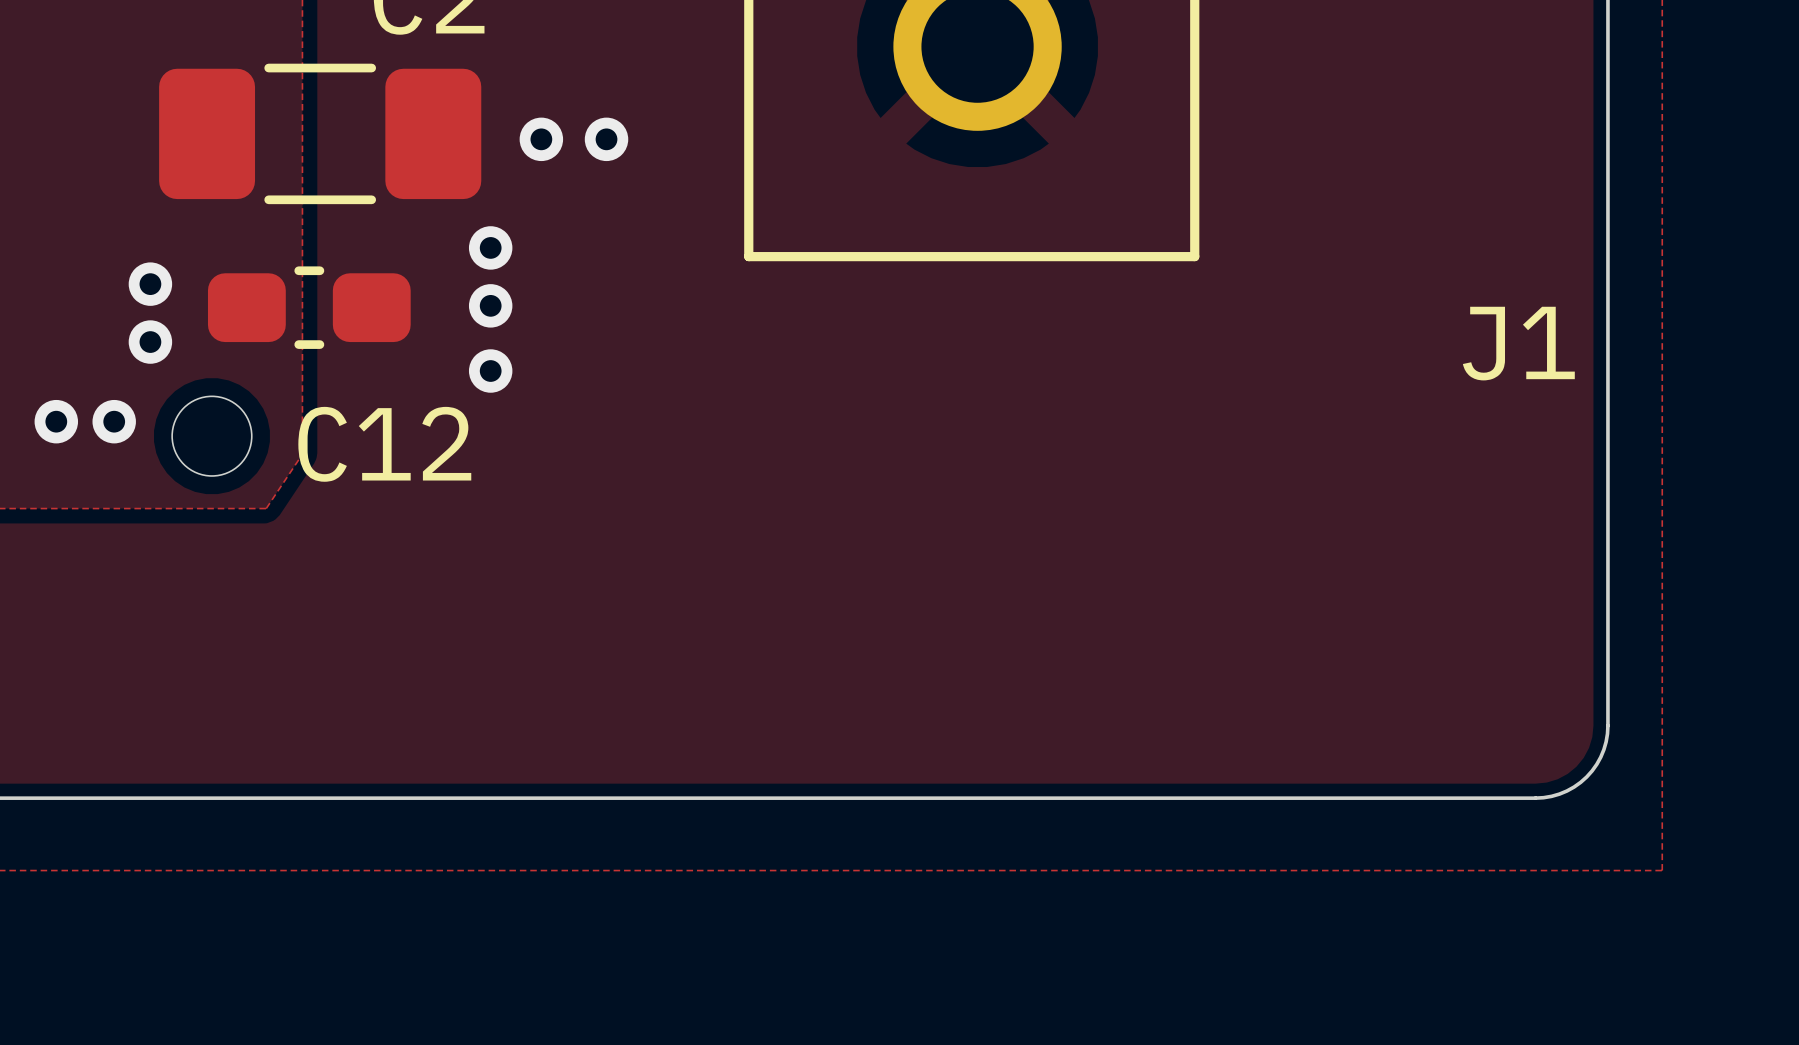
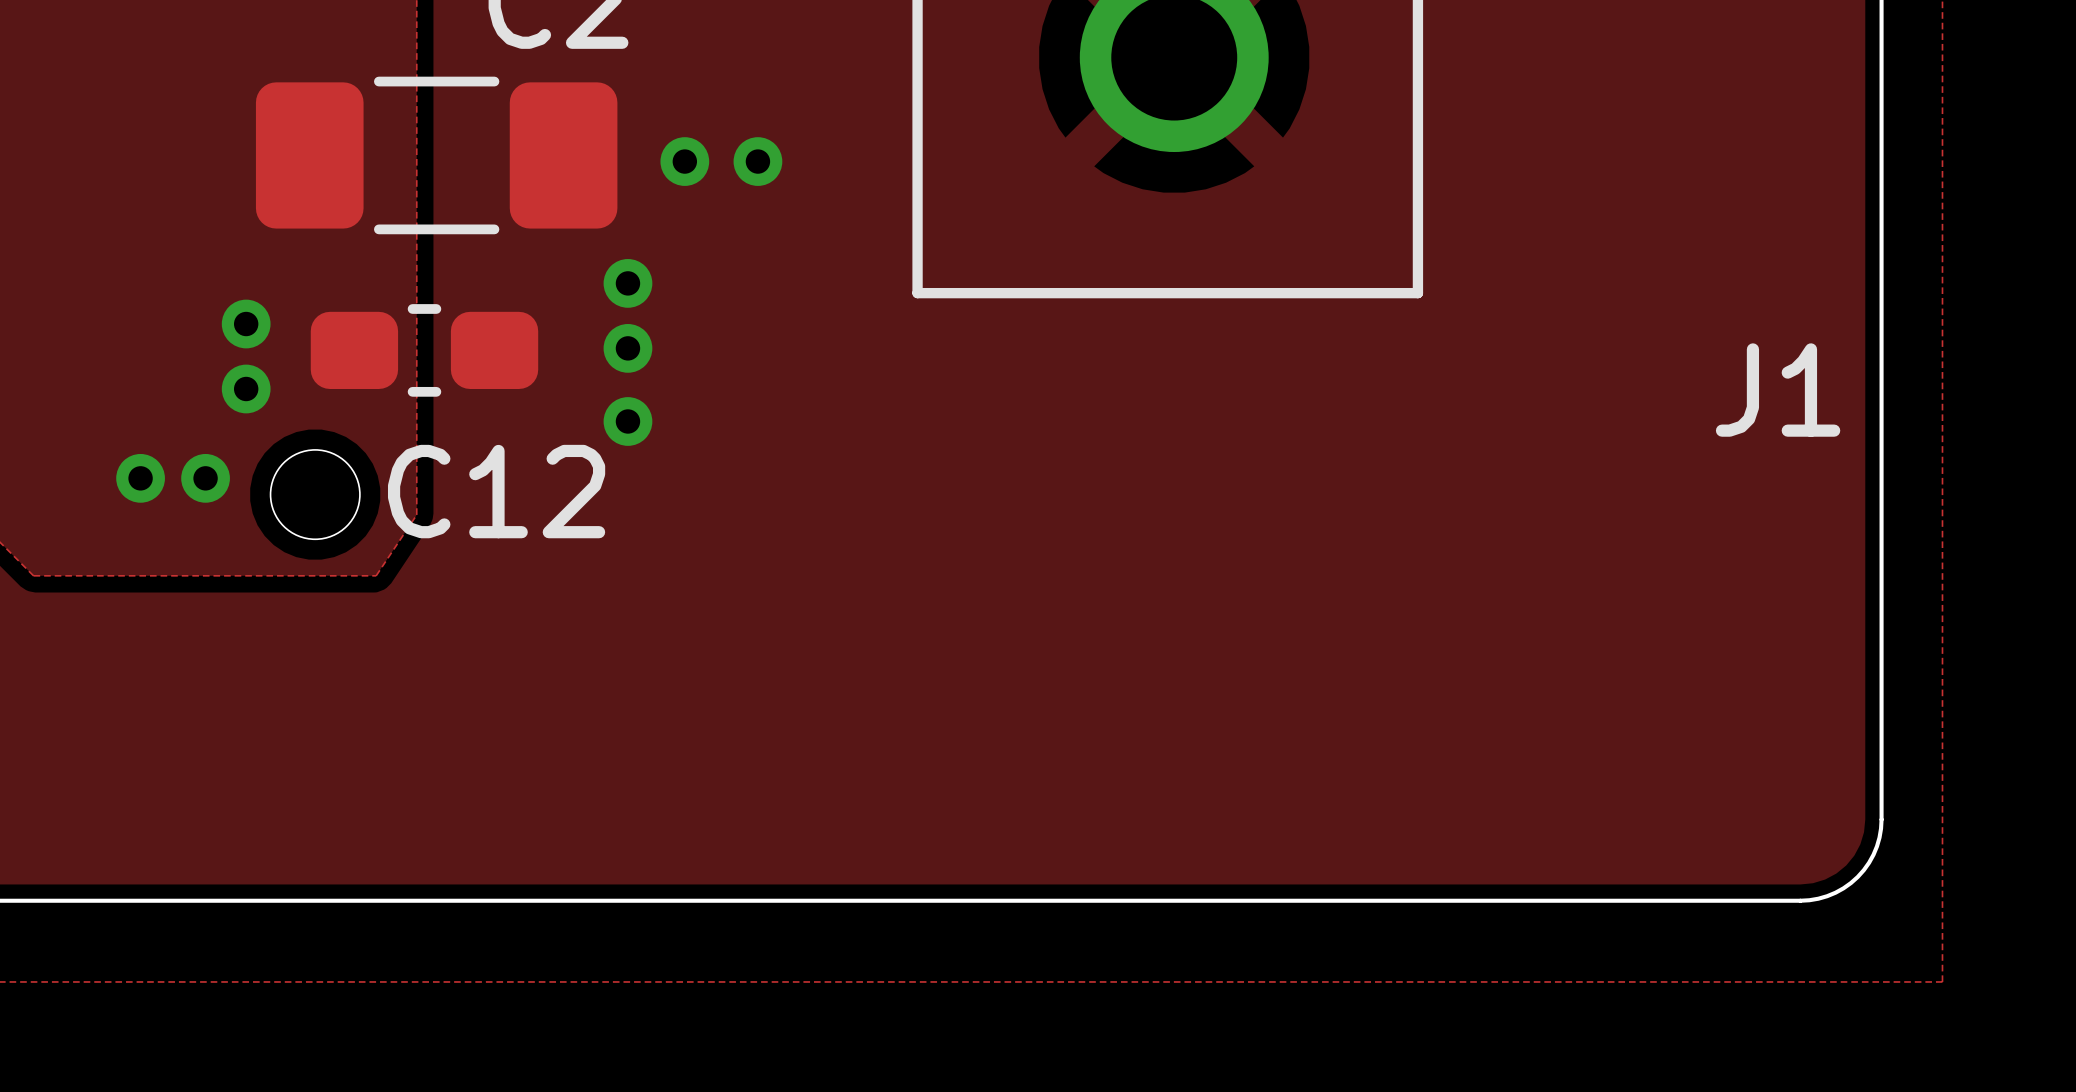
C12 name position: C12 (384, 444) -> C12 (496, 491)

